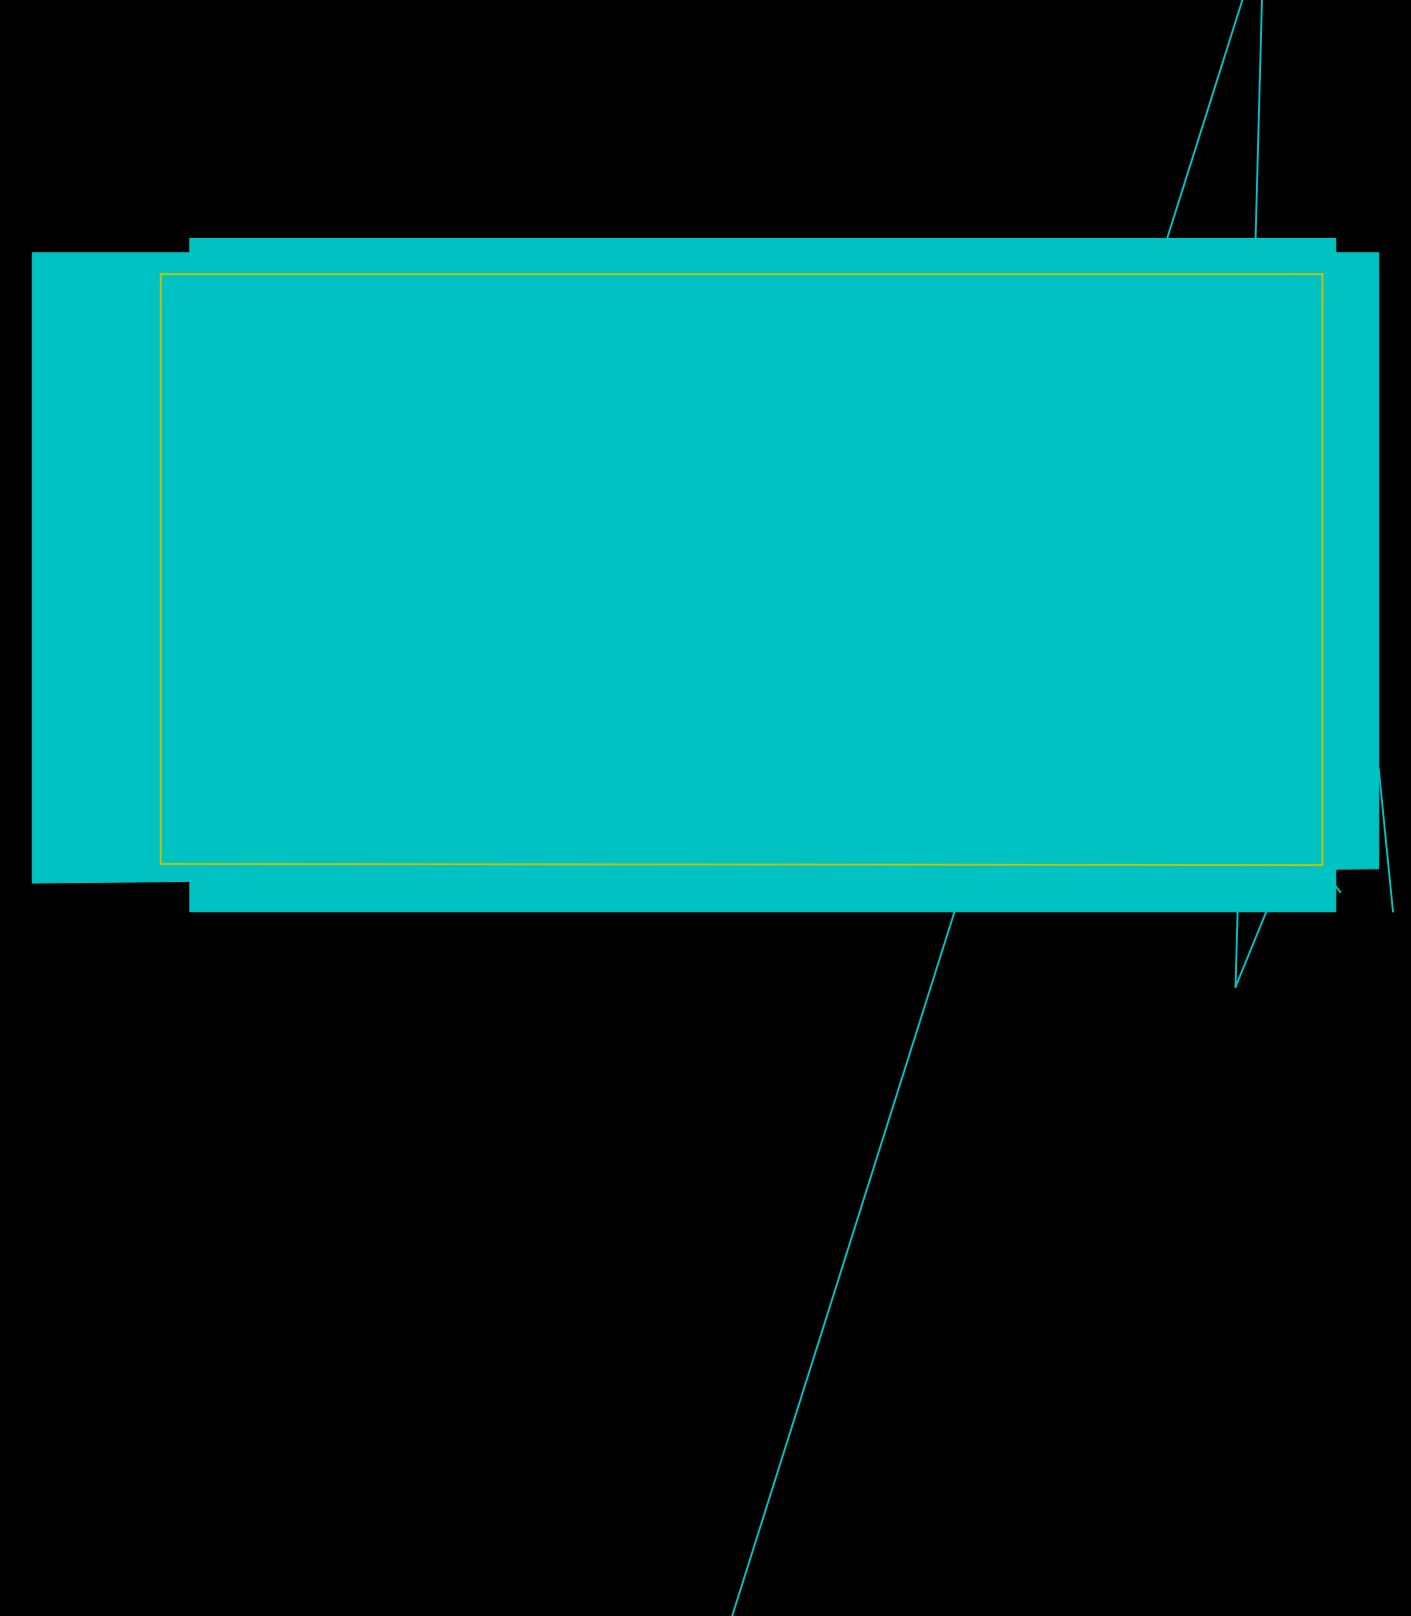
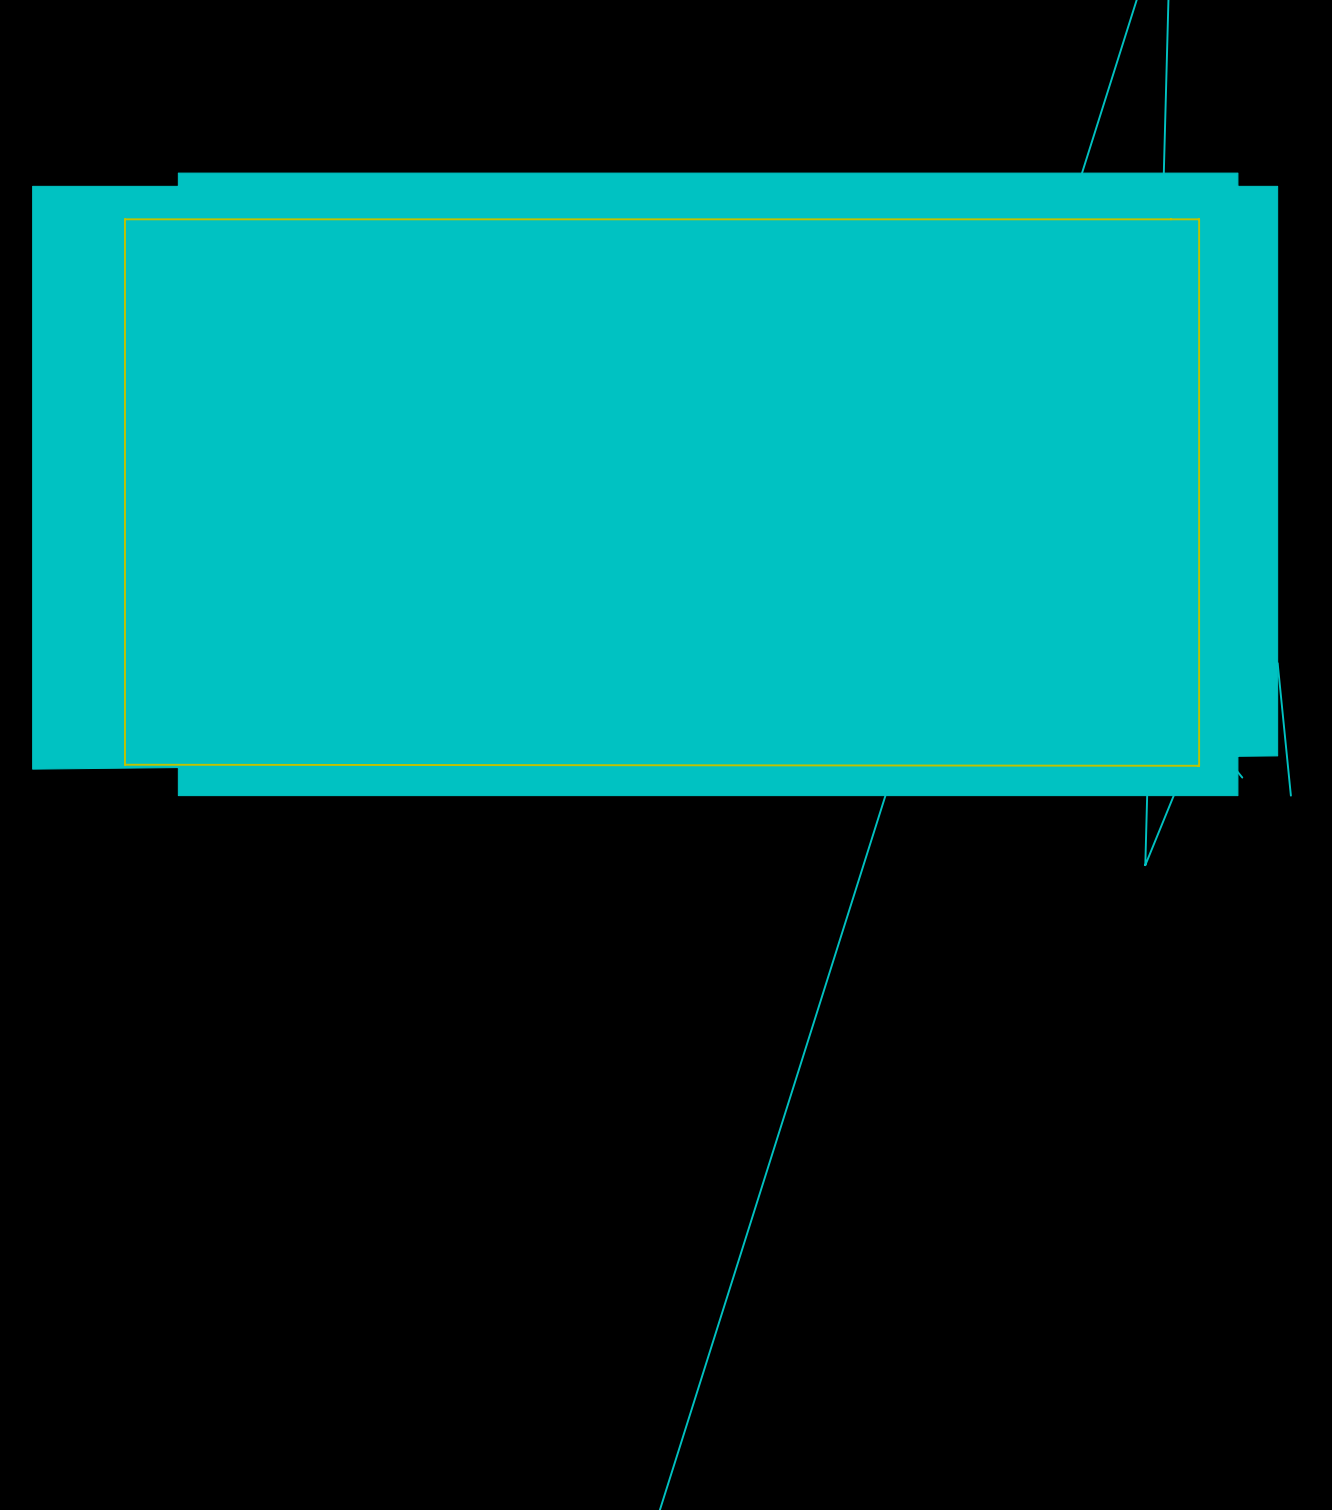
board edge: (1322, 274) (1322, 865) (160, 863) (160, 274) (1322, 274) -> (1199, 219) (1199, 765) (124, 764) (124, 219) (1199, 219)

